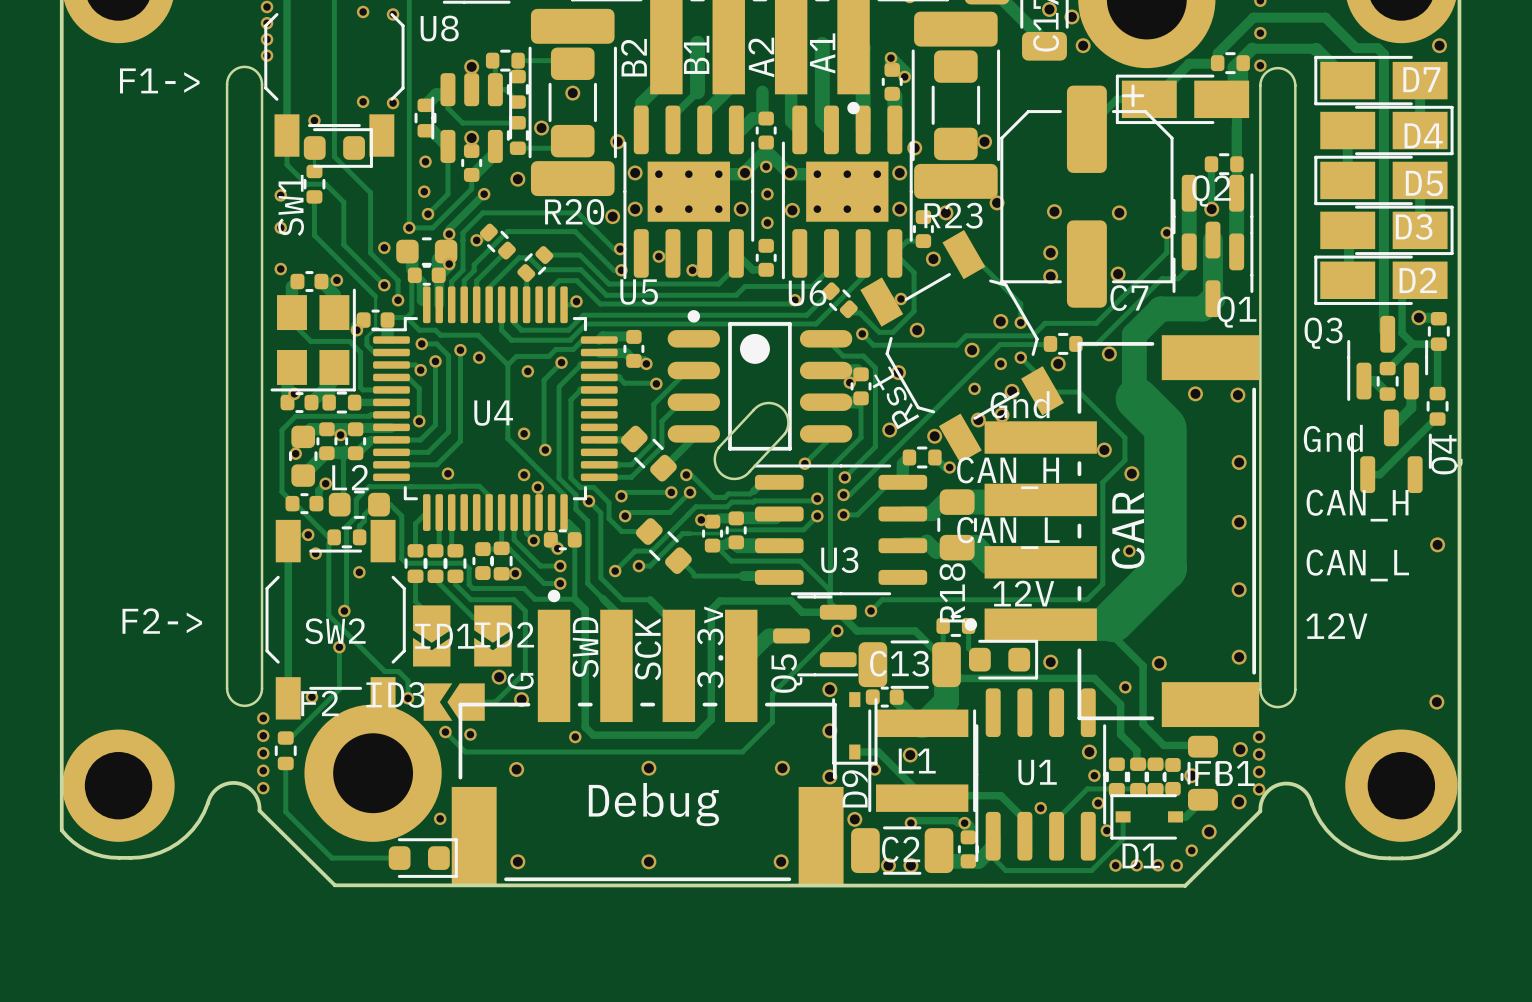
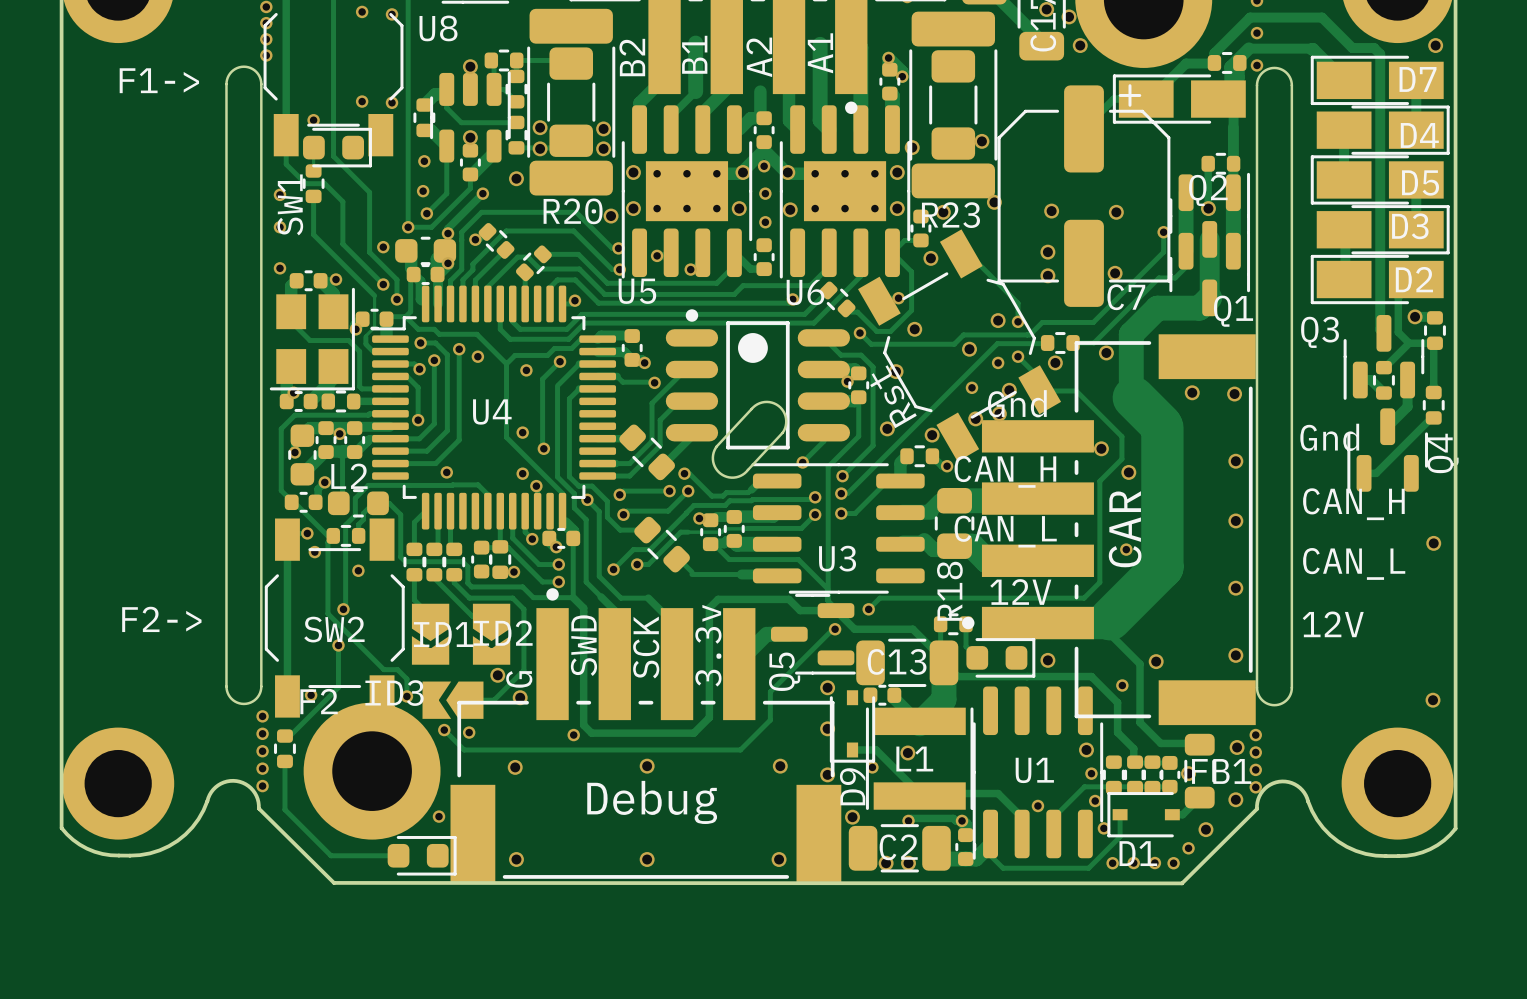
via: (572, 93) -> none
via: none -> (603, 128)
via: (617, 141) -> none
via: none -> (540, 148)
via: none -> (603, 148)

